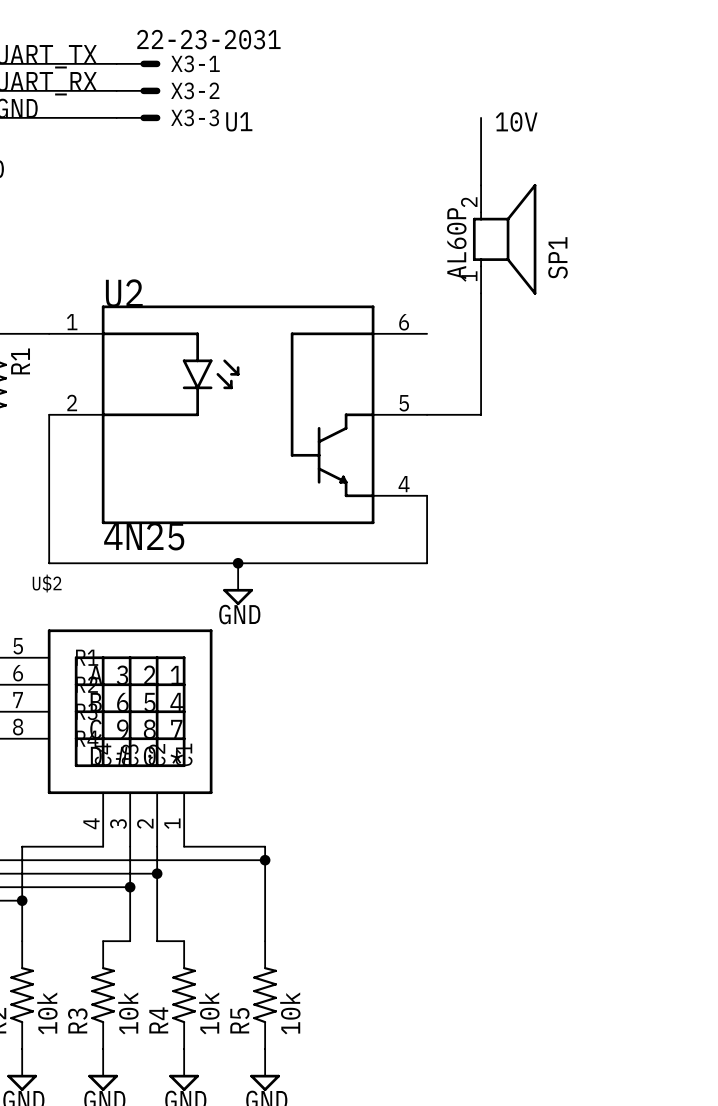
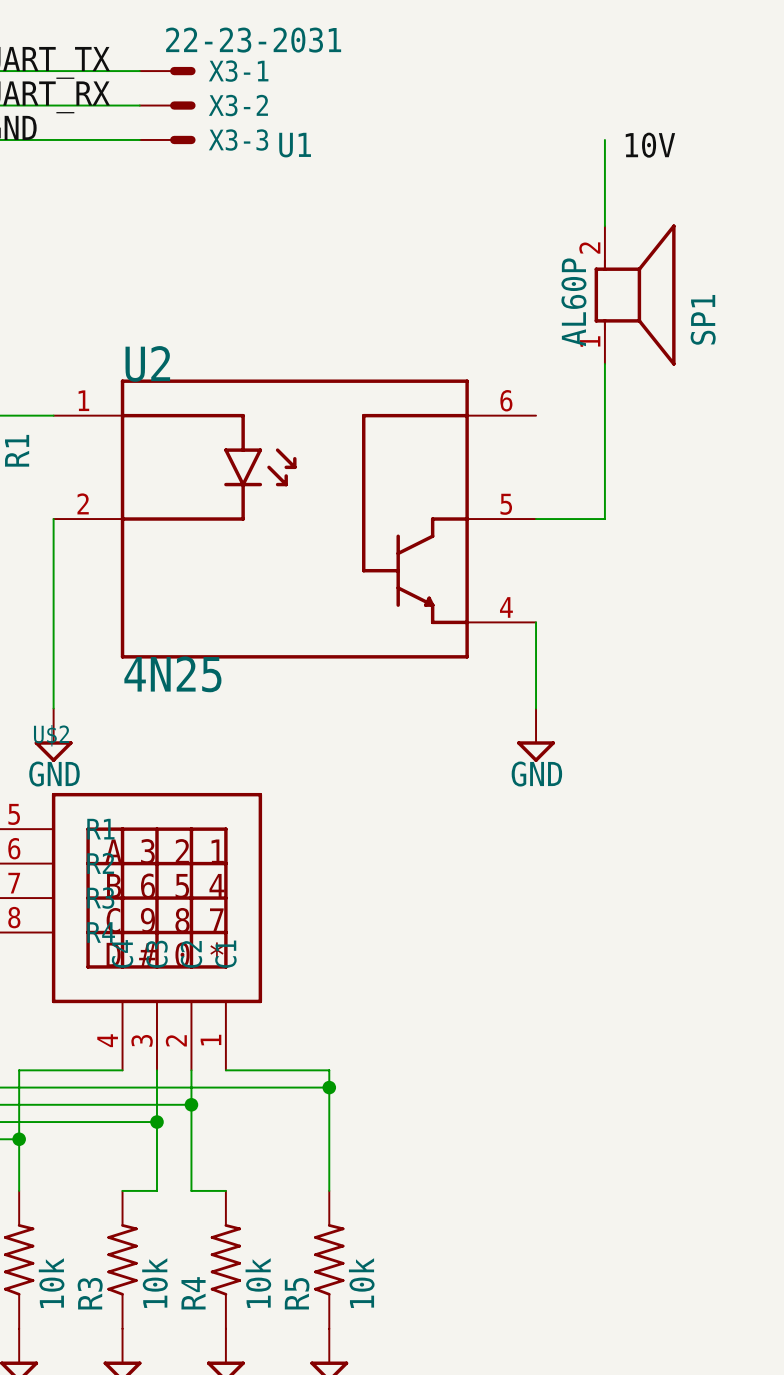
wire: (49, 563) (427, 563) -> none
junction: (238, 563) -> none
power symbol: none -> GND (53, 735)
power symbol: GND (238, 584) -> none
power symbol: none -> GND (536, 735)

